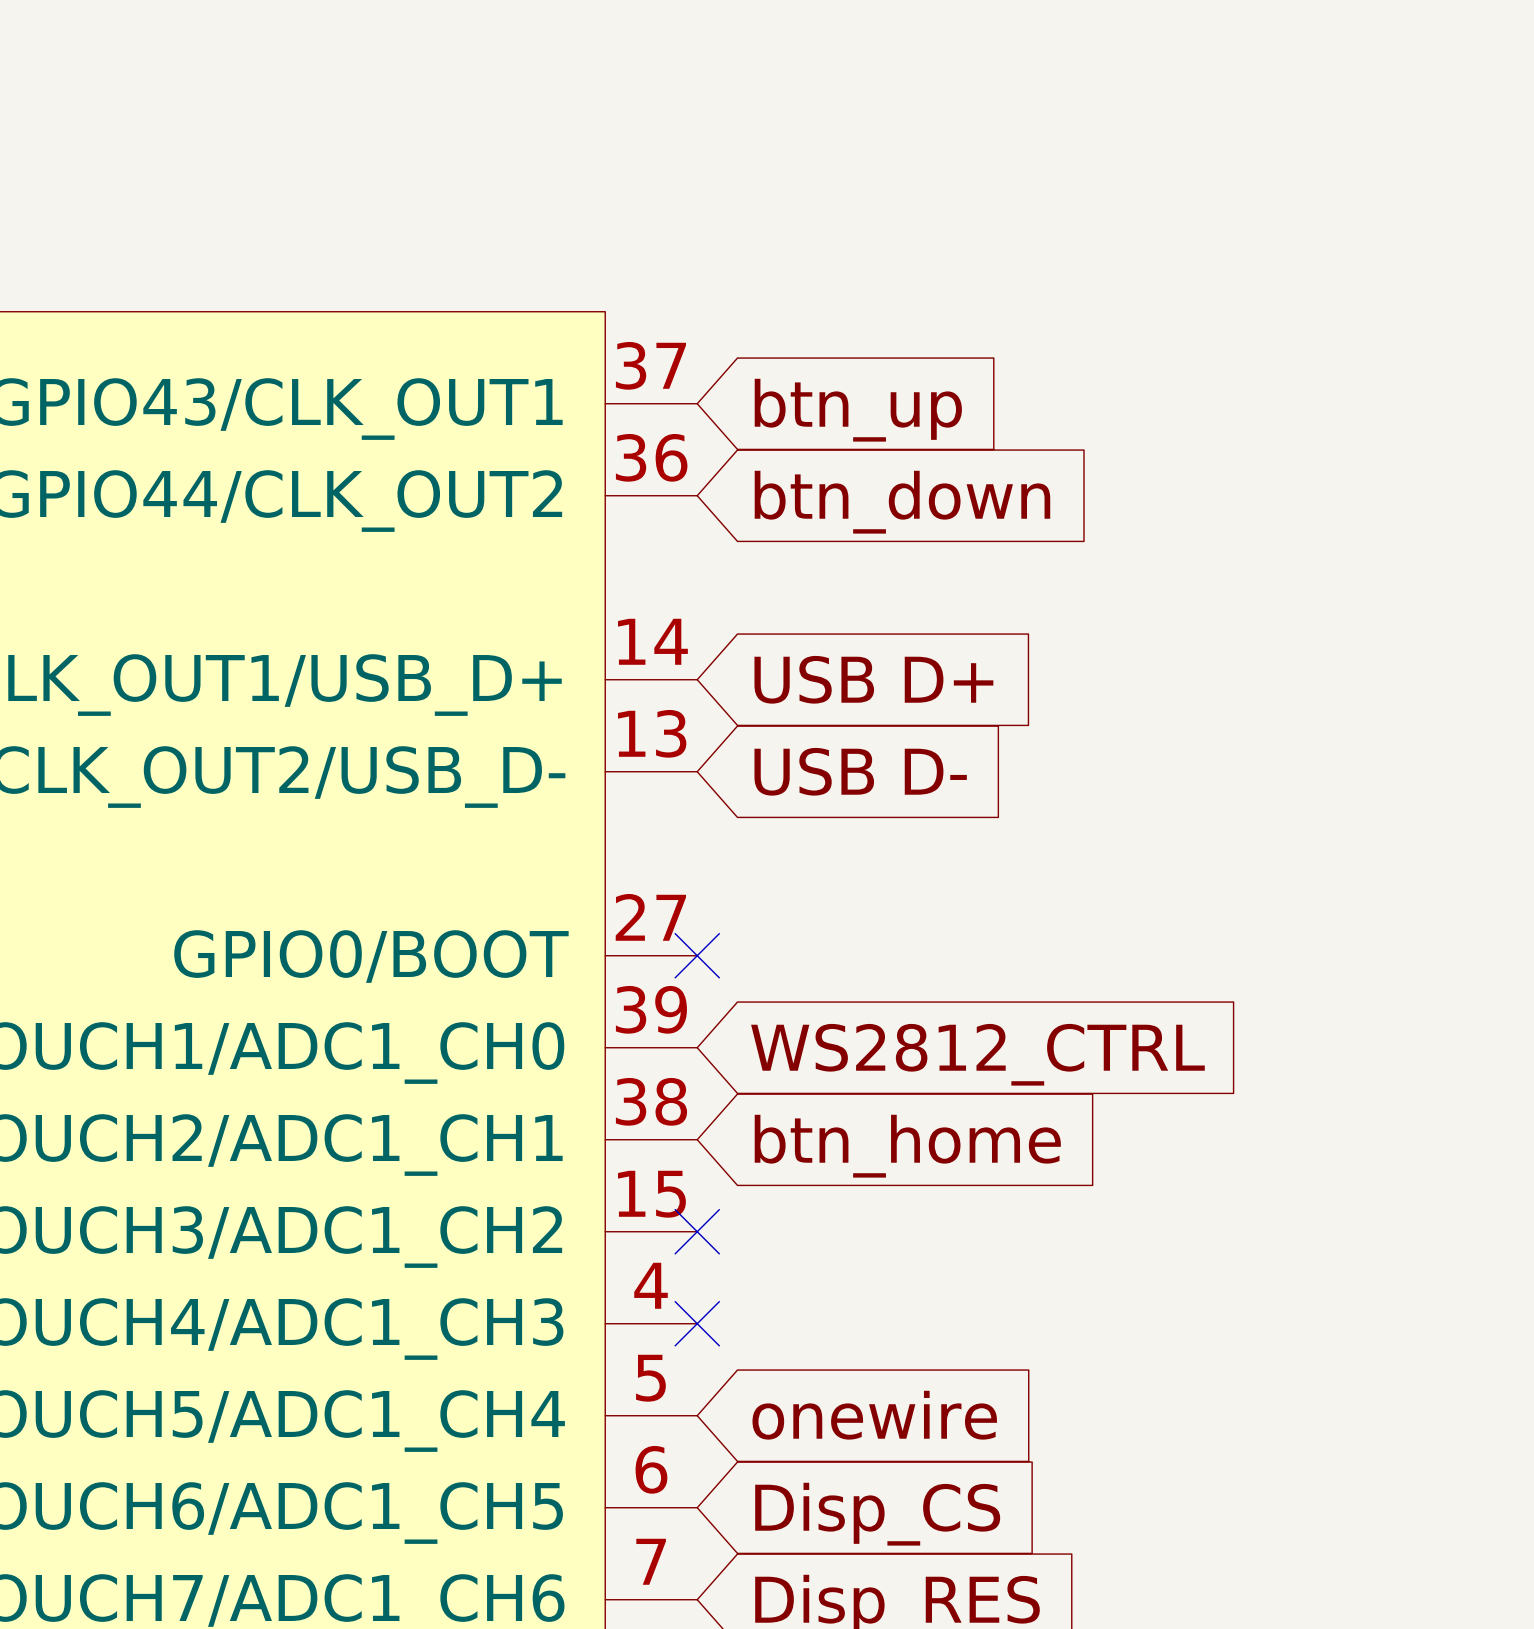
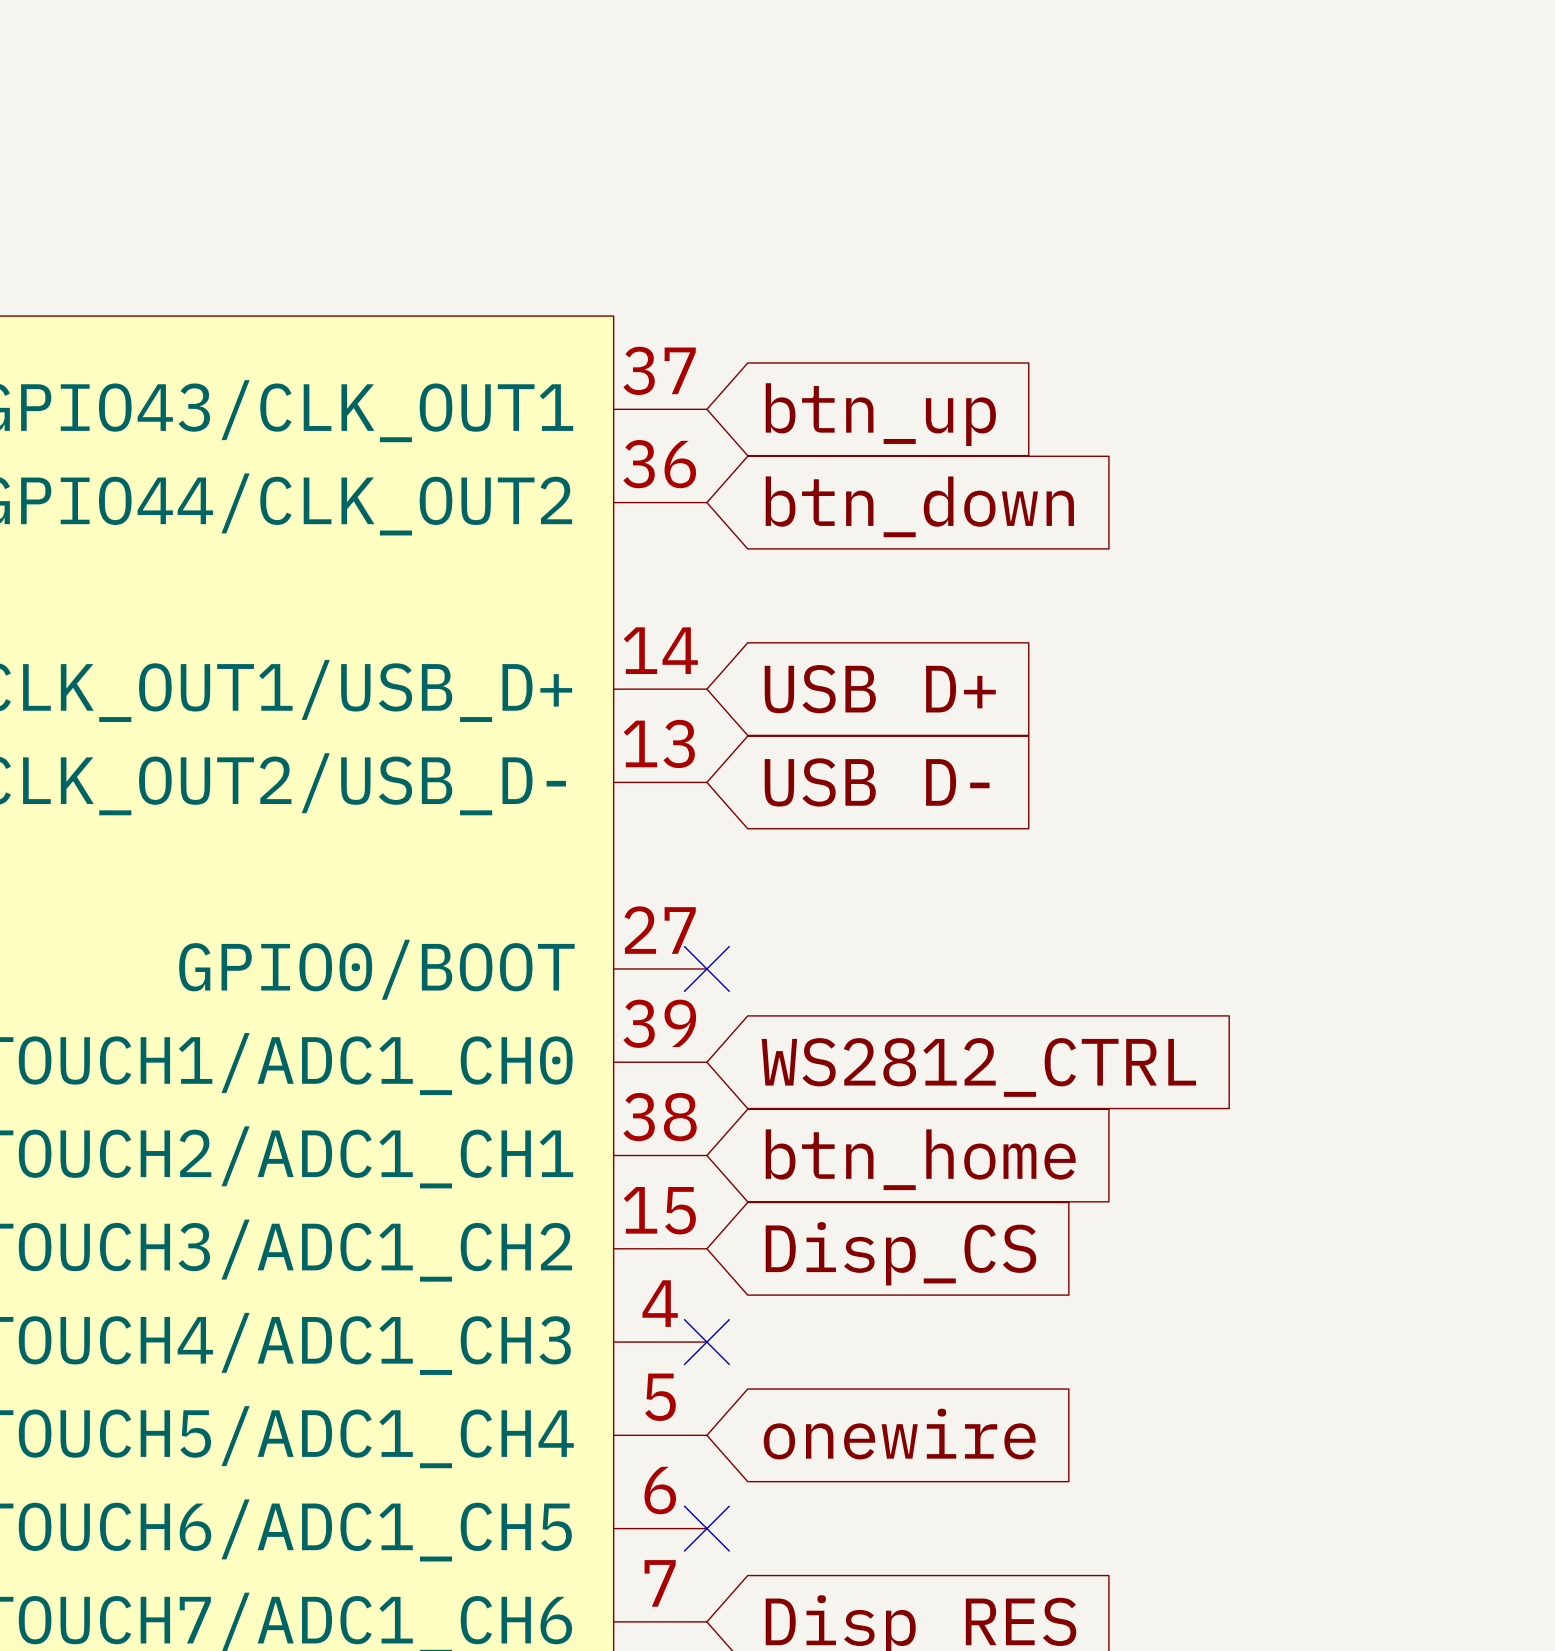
no-connect mark: (697, 1231) -> none
no-connect mark: none -> (706, 1528)
global label position: Disp_CS (877, 1514) -> Disp_CS (900, 1253)

